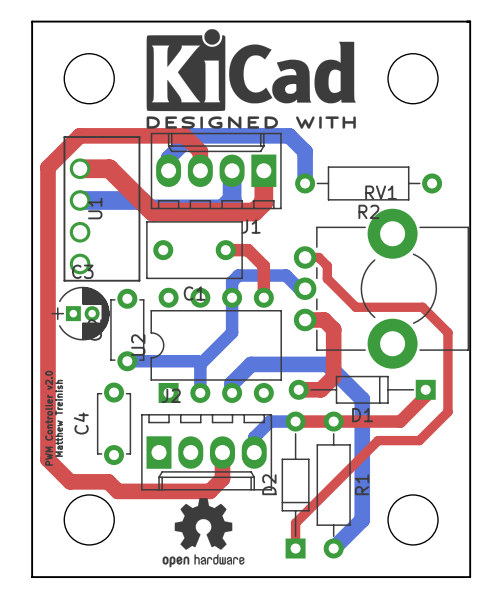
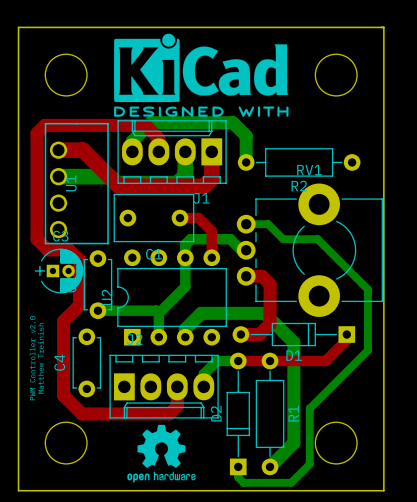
top track: (200, 154) (200, 151) (184, 135) (79, 135) (47, 167) (47, 459) (70, 481) (108, 481) (117, 491) (209, 491) (222, 478) (222, 475) -> (158, 138) (145, 125) (44, 125) (37, 133) (37, 239) (47, 249) (68, 249) (79, 260) (79, 305) (63, 321) (63, 395) (82, 413) (169, 413) (177, 406)
top track: (305, 257) (318, 257) (327, 266) (327, 278) (355, 307) (422, 307) (447, 332) (447, 412) (419, 440) (378, 440) (295, 523) (295, 548) -> none
bottom track: none -> (246, 224) (268, 224) (283, 239) (317, 239) (367, 289) (367, 350) (309, 408) (309, 464) (291, 482) (243, 482) (238, 477) (238, 466)

